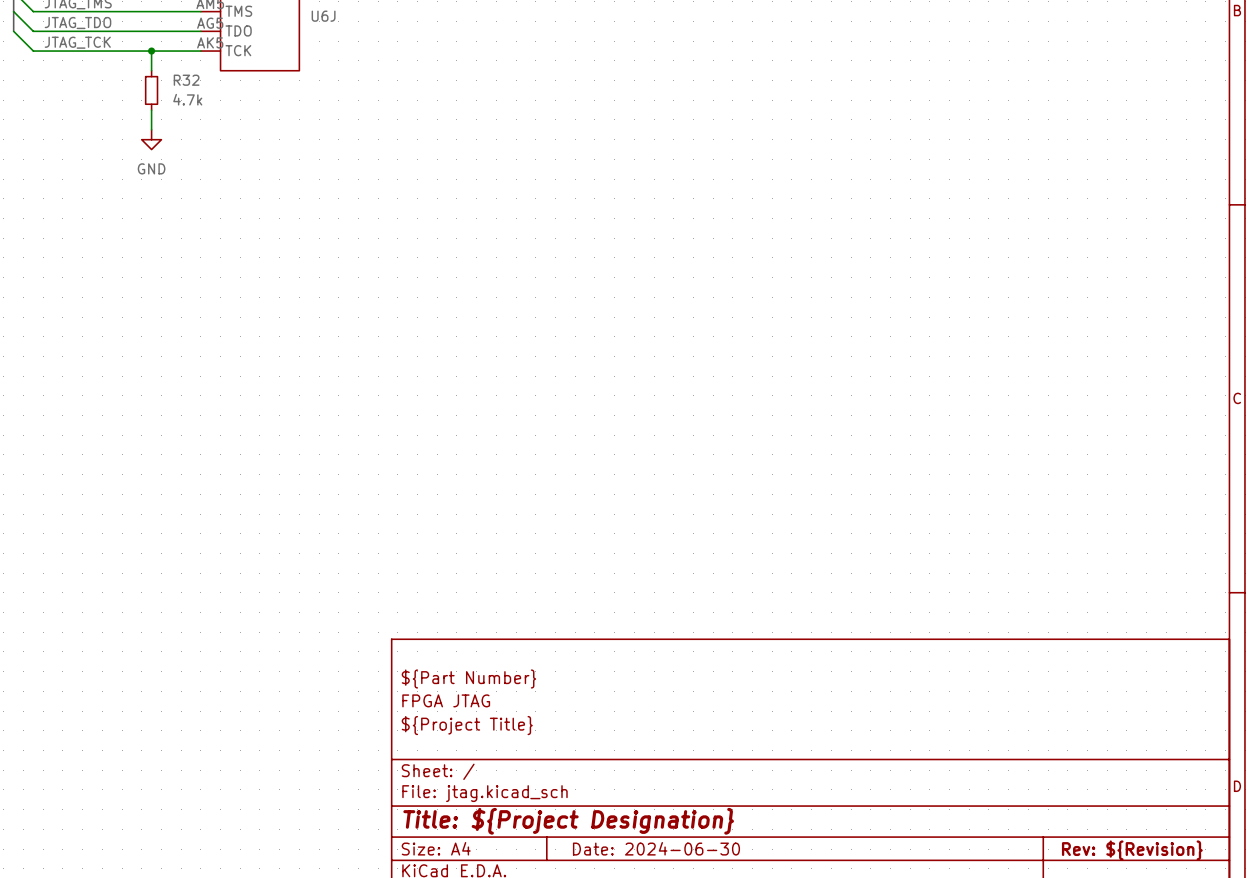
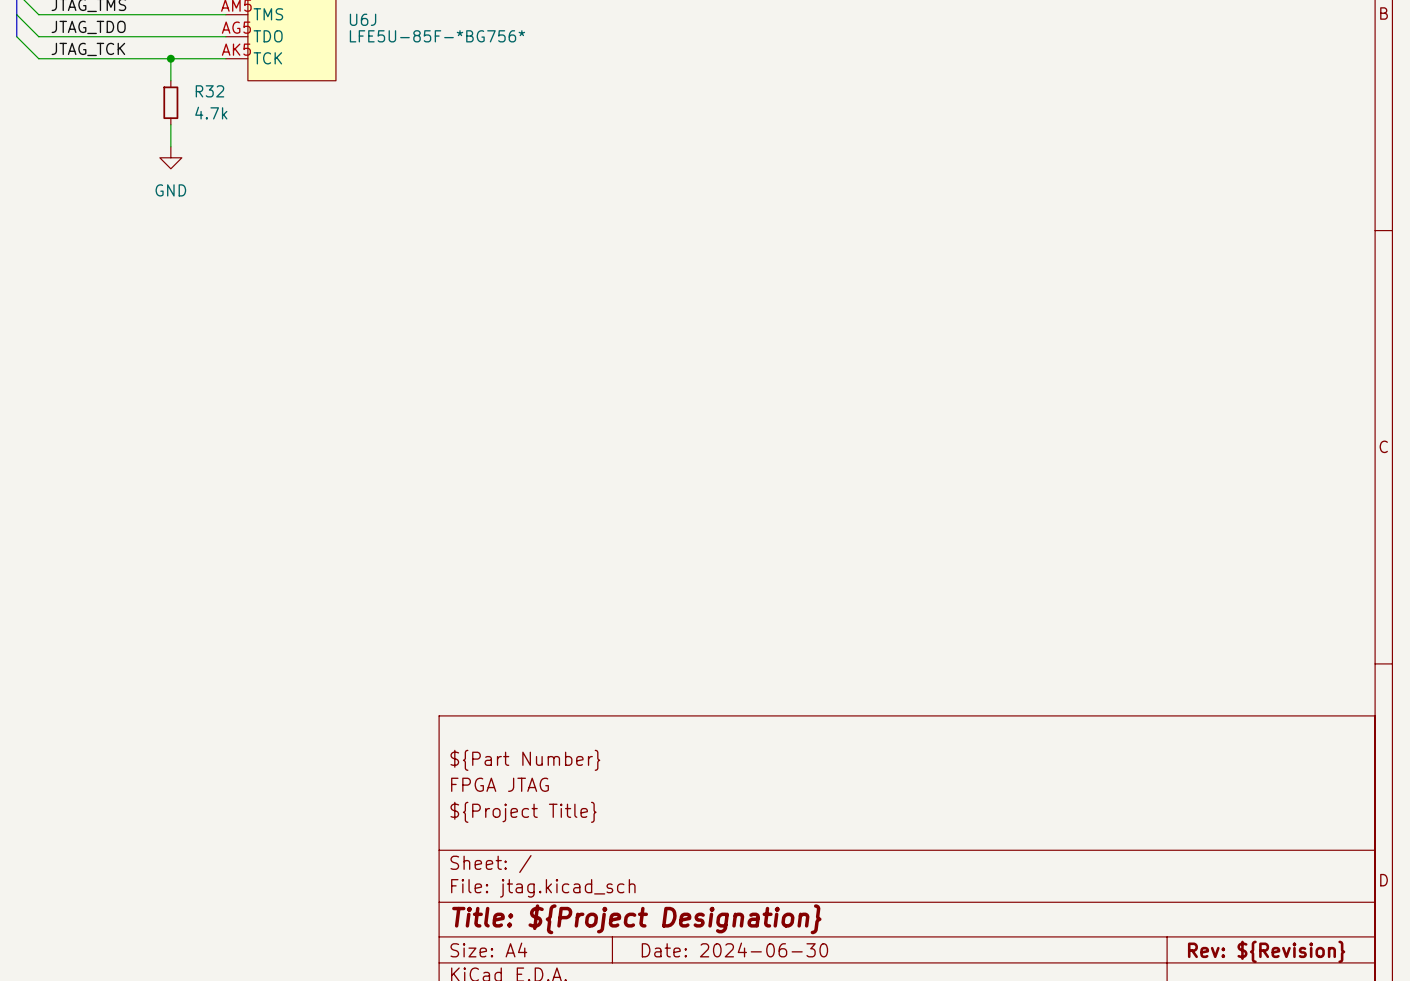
U6J value: none -> LFE5U-85F-*BG756* (437, 36)

